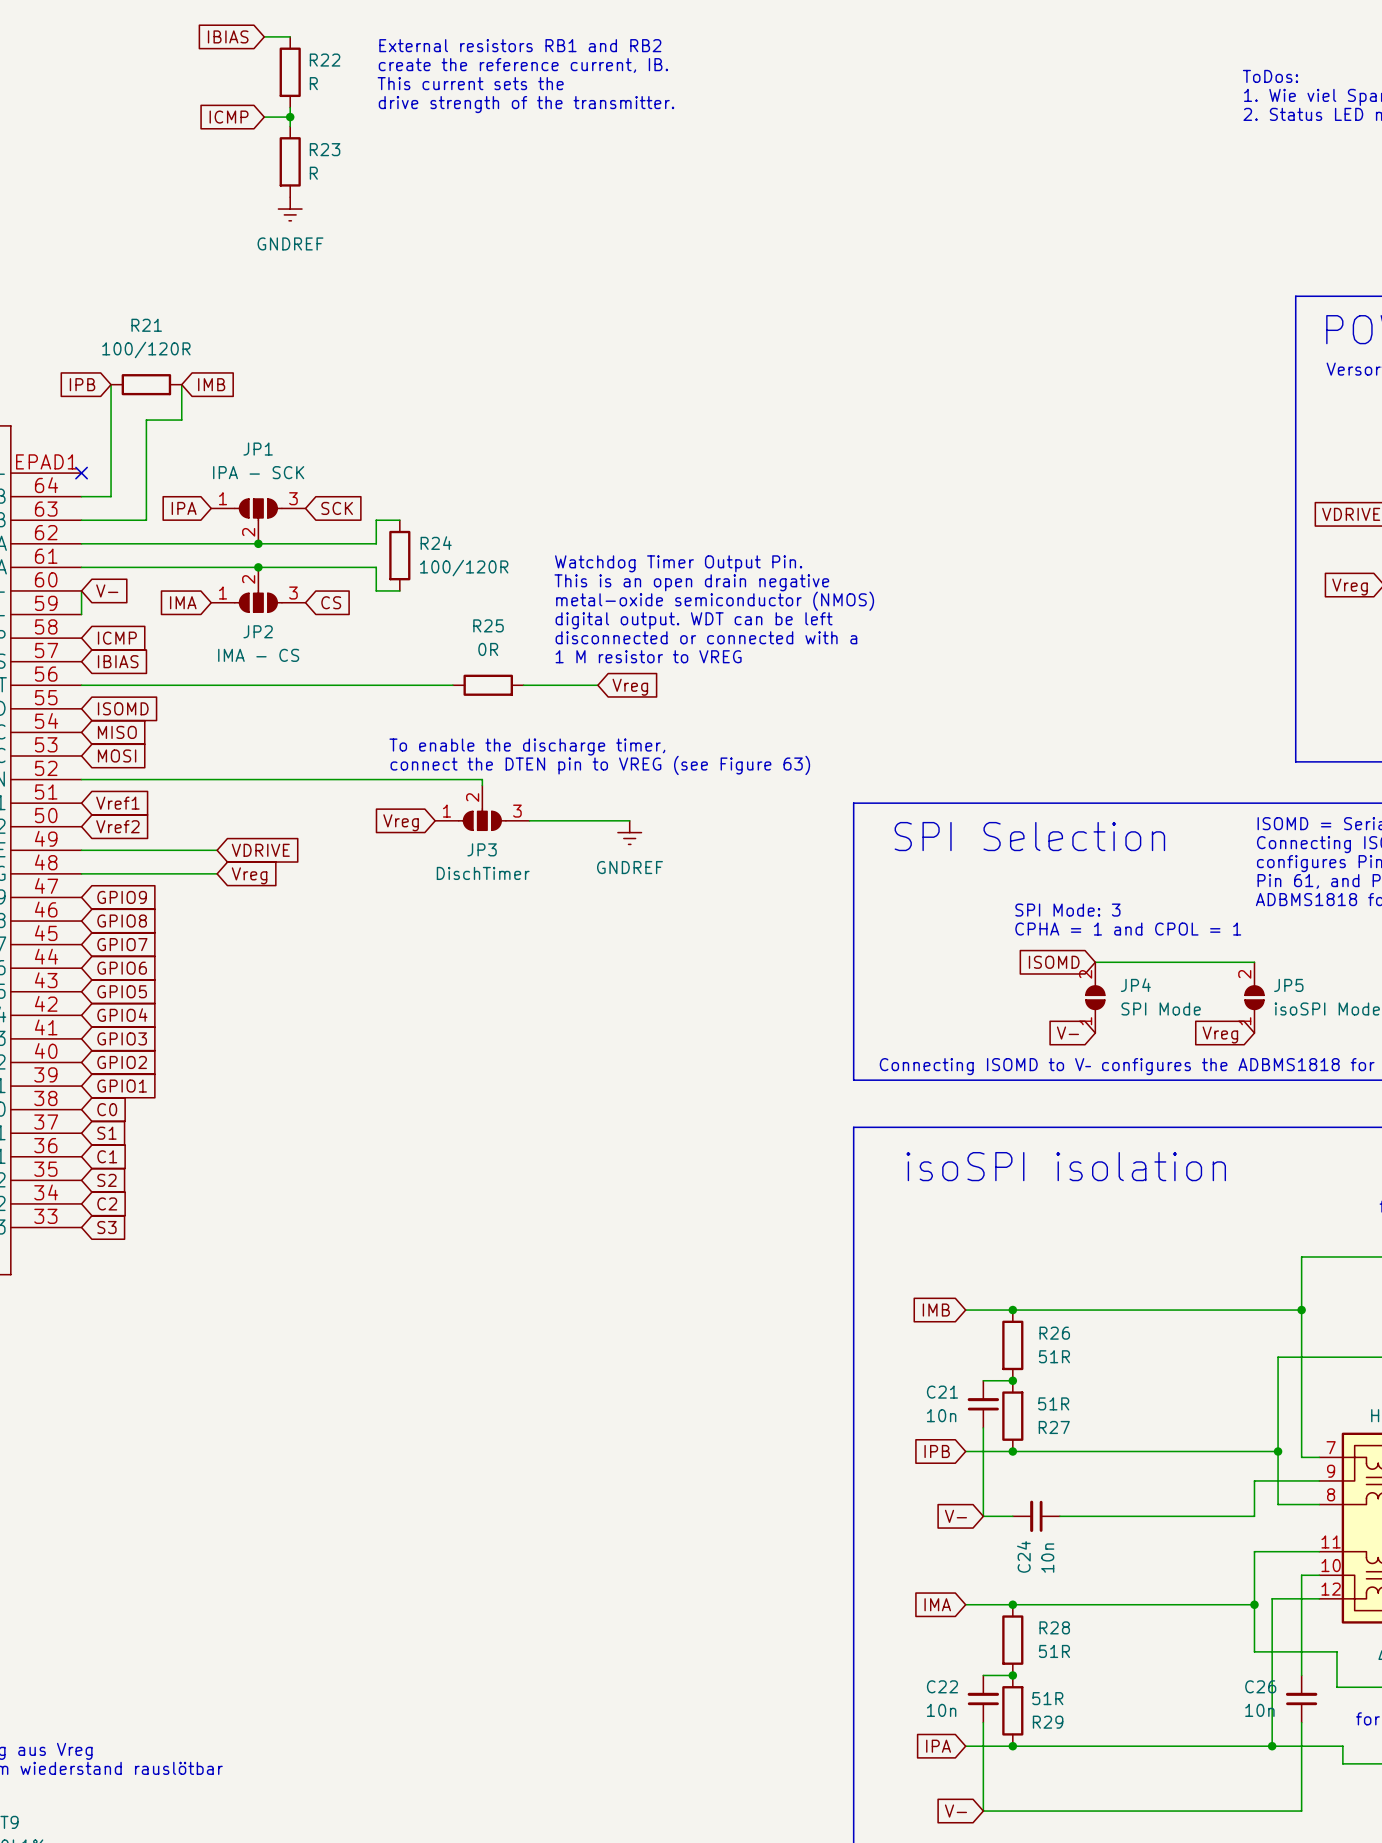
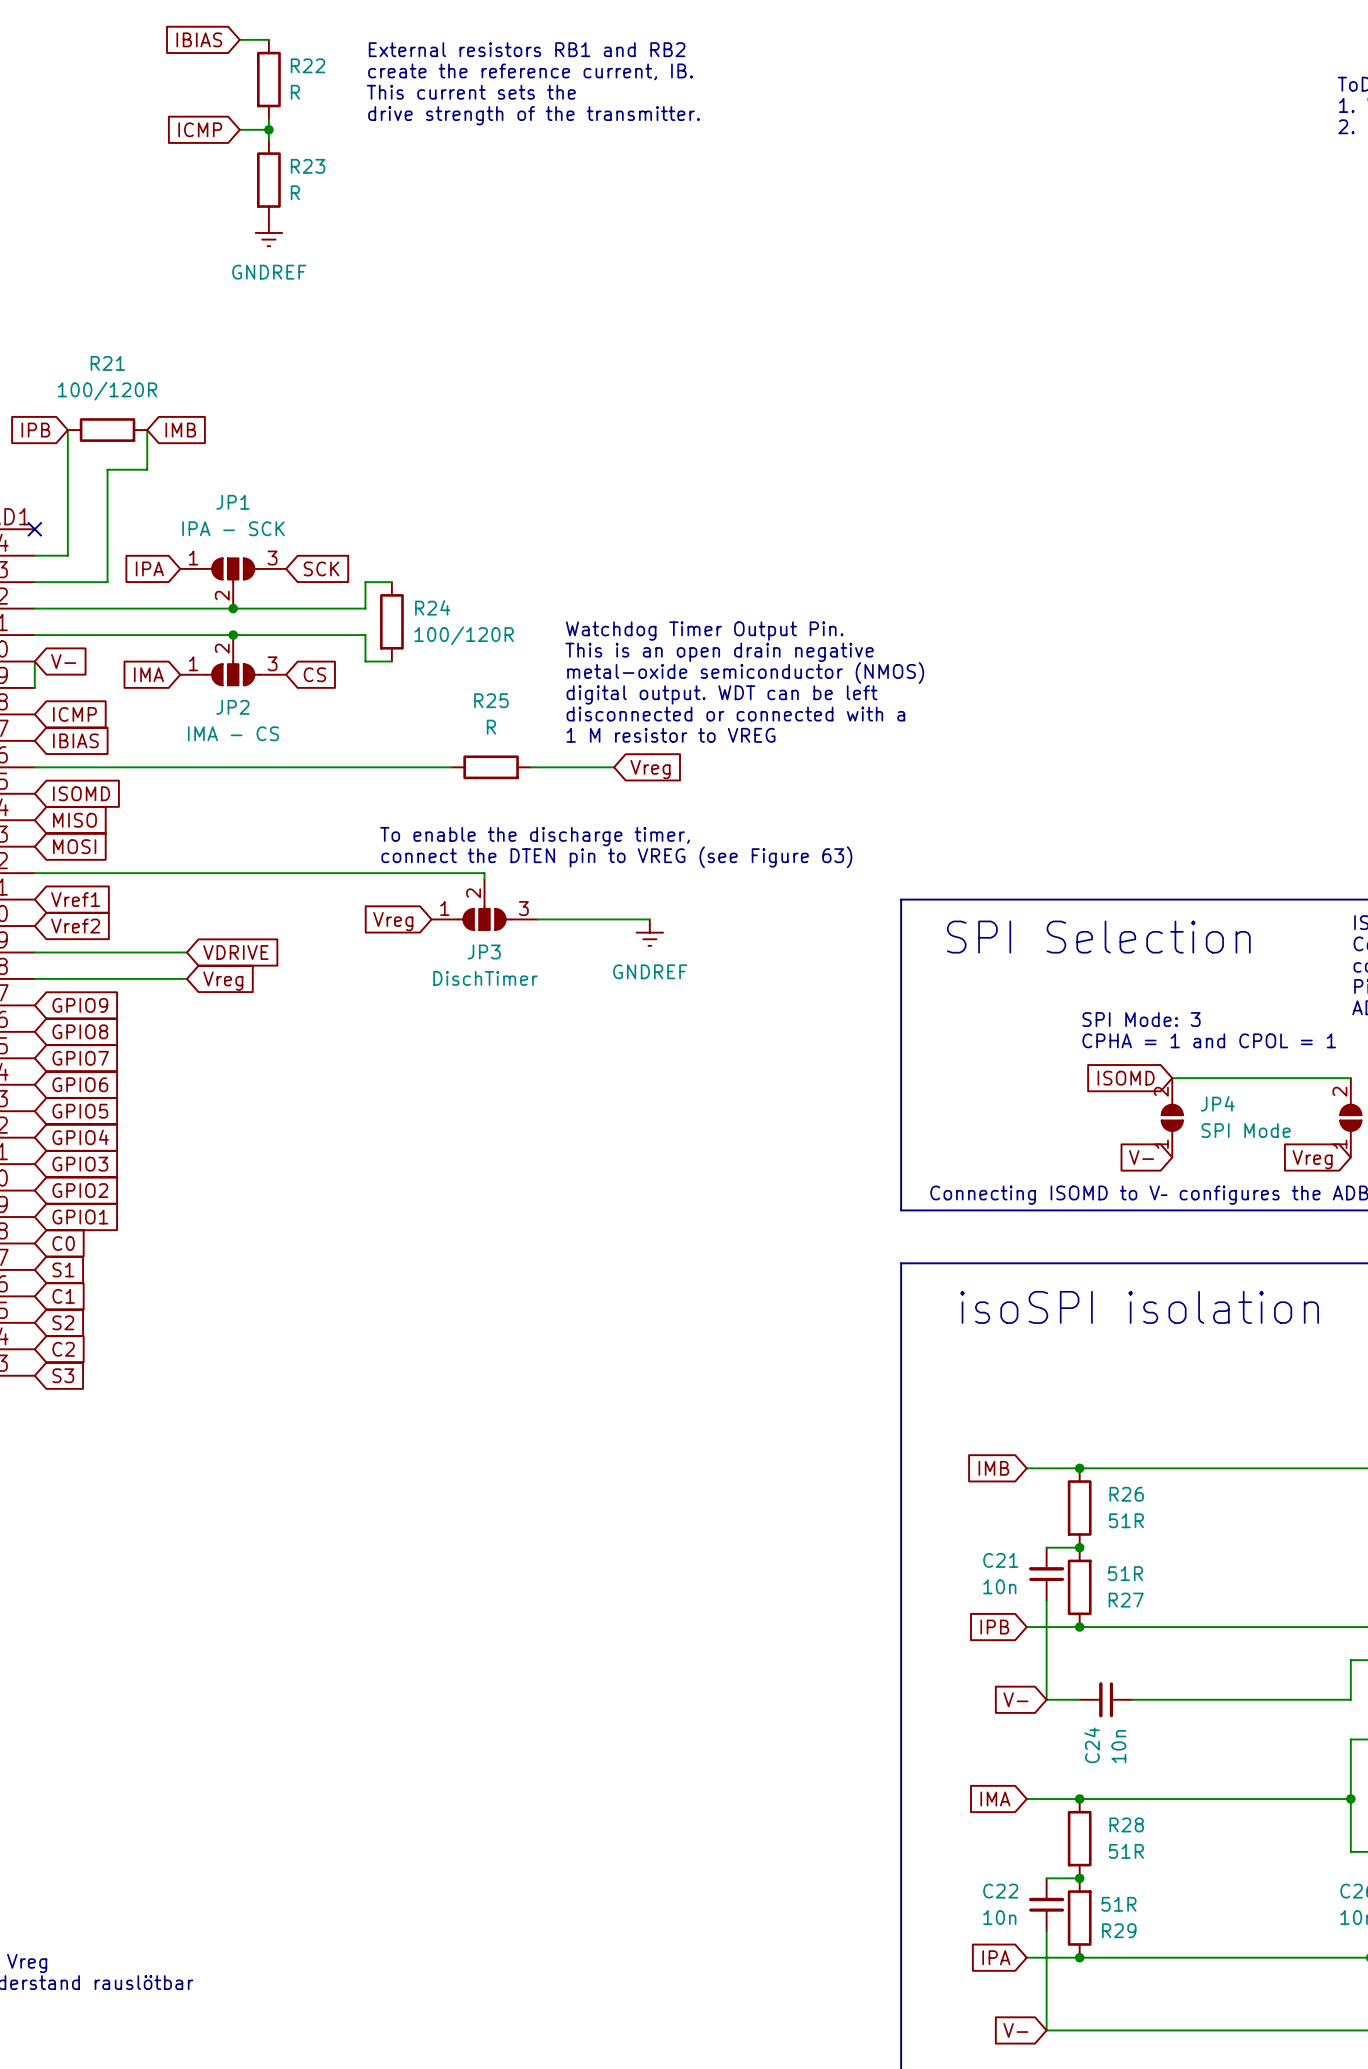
R25 value: 0R (488, 649) -> R (491, 727)

